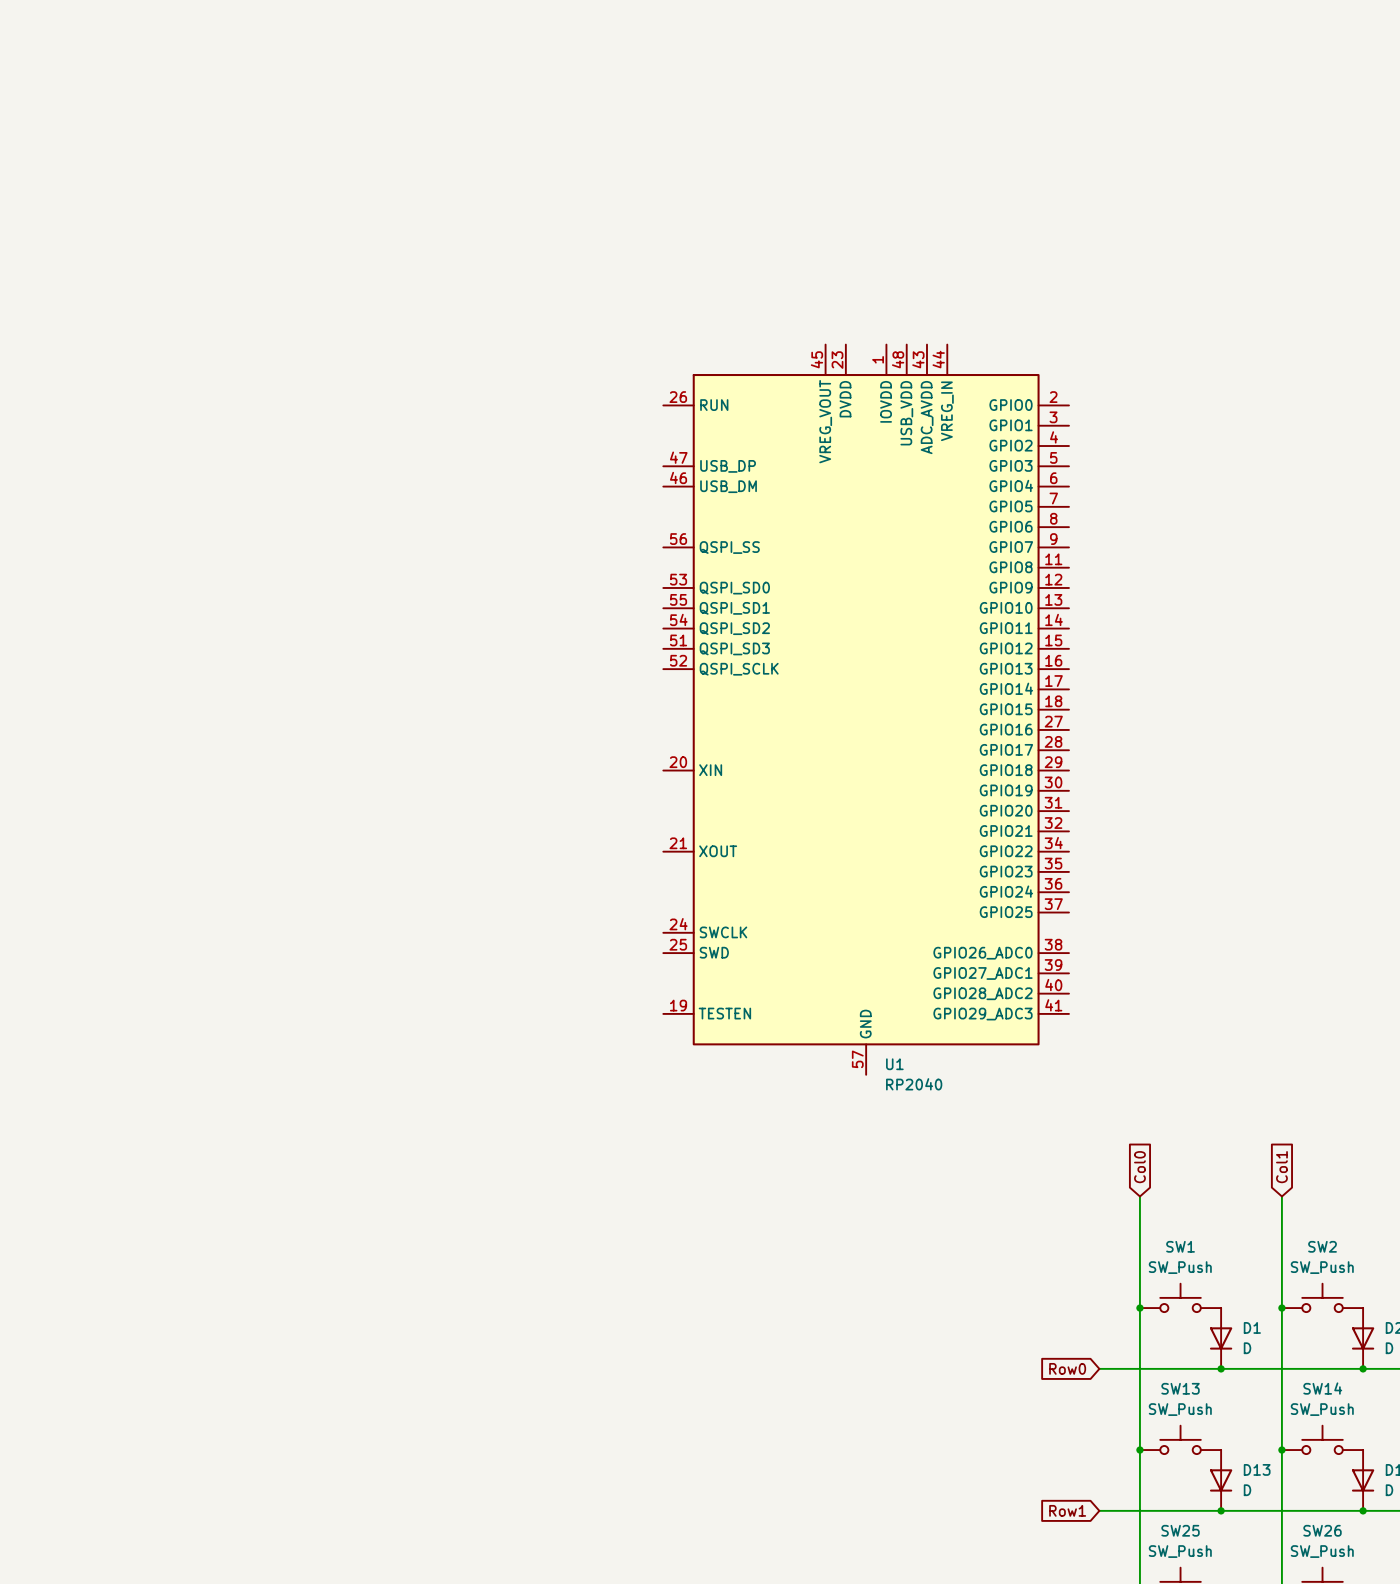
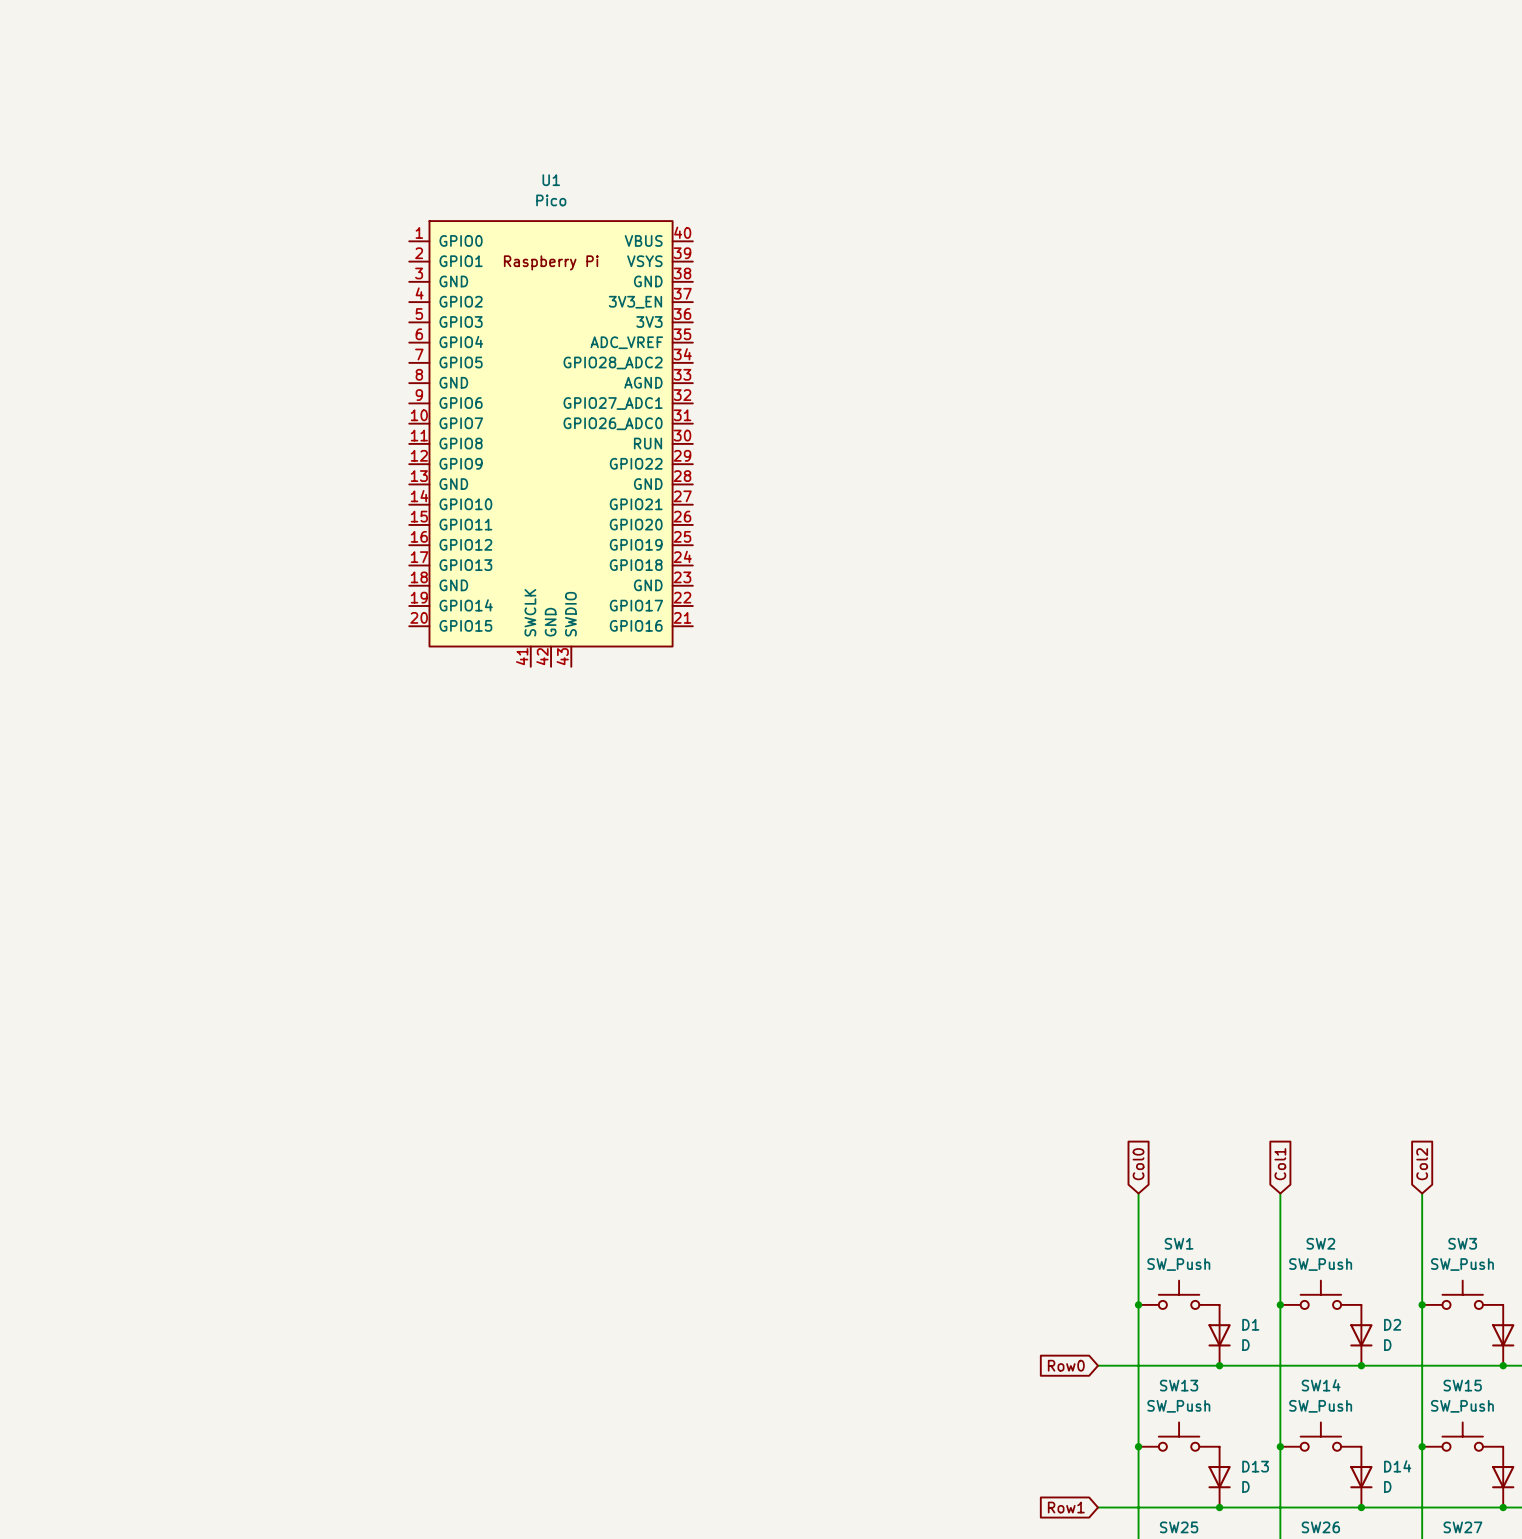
U1 symbol: [663, 344, 1069, 1075] -> [409, 221, 693, 667]
U1 name position: U1 (894, 1064) -> U1 (551, 180)
U1 value: RP2040 (914, 1084) -> Pico (551, 200)

